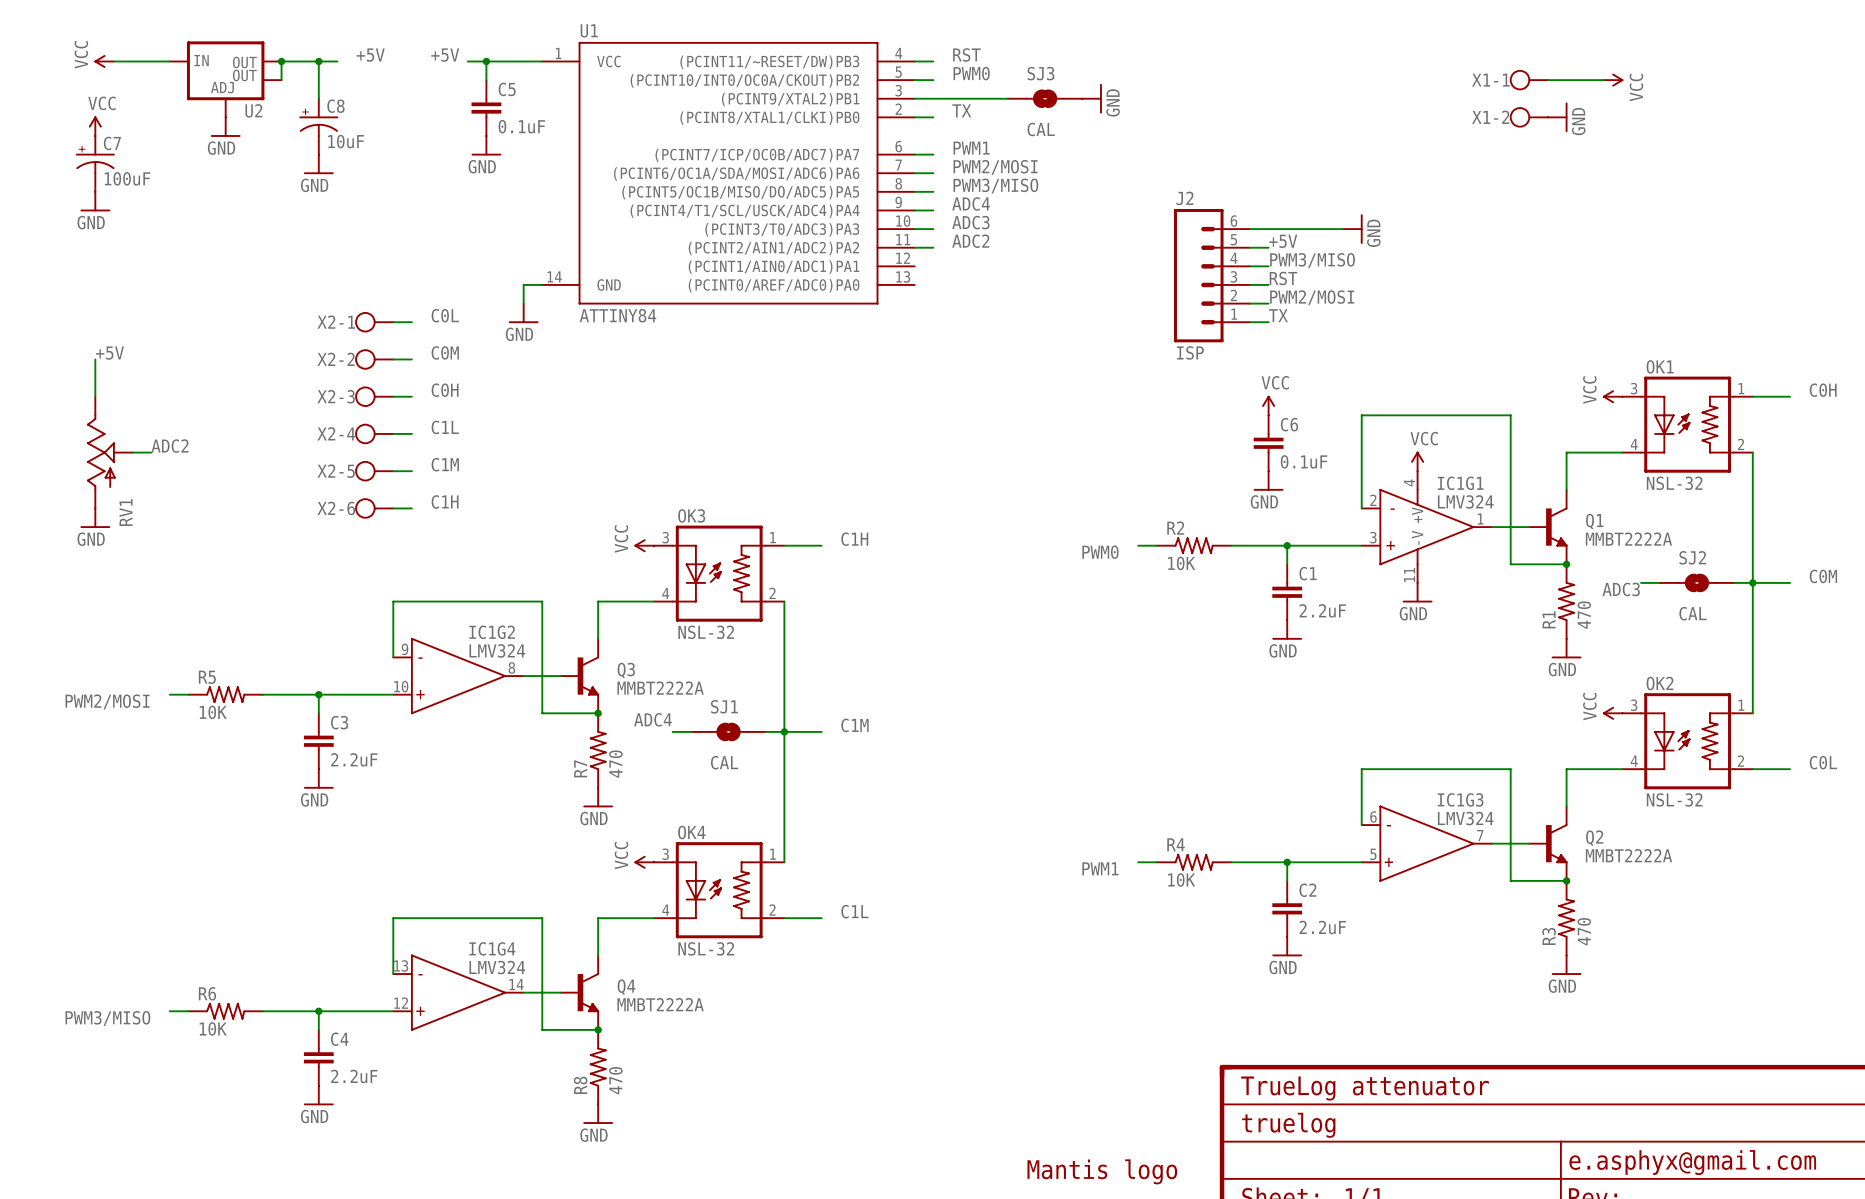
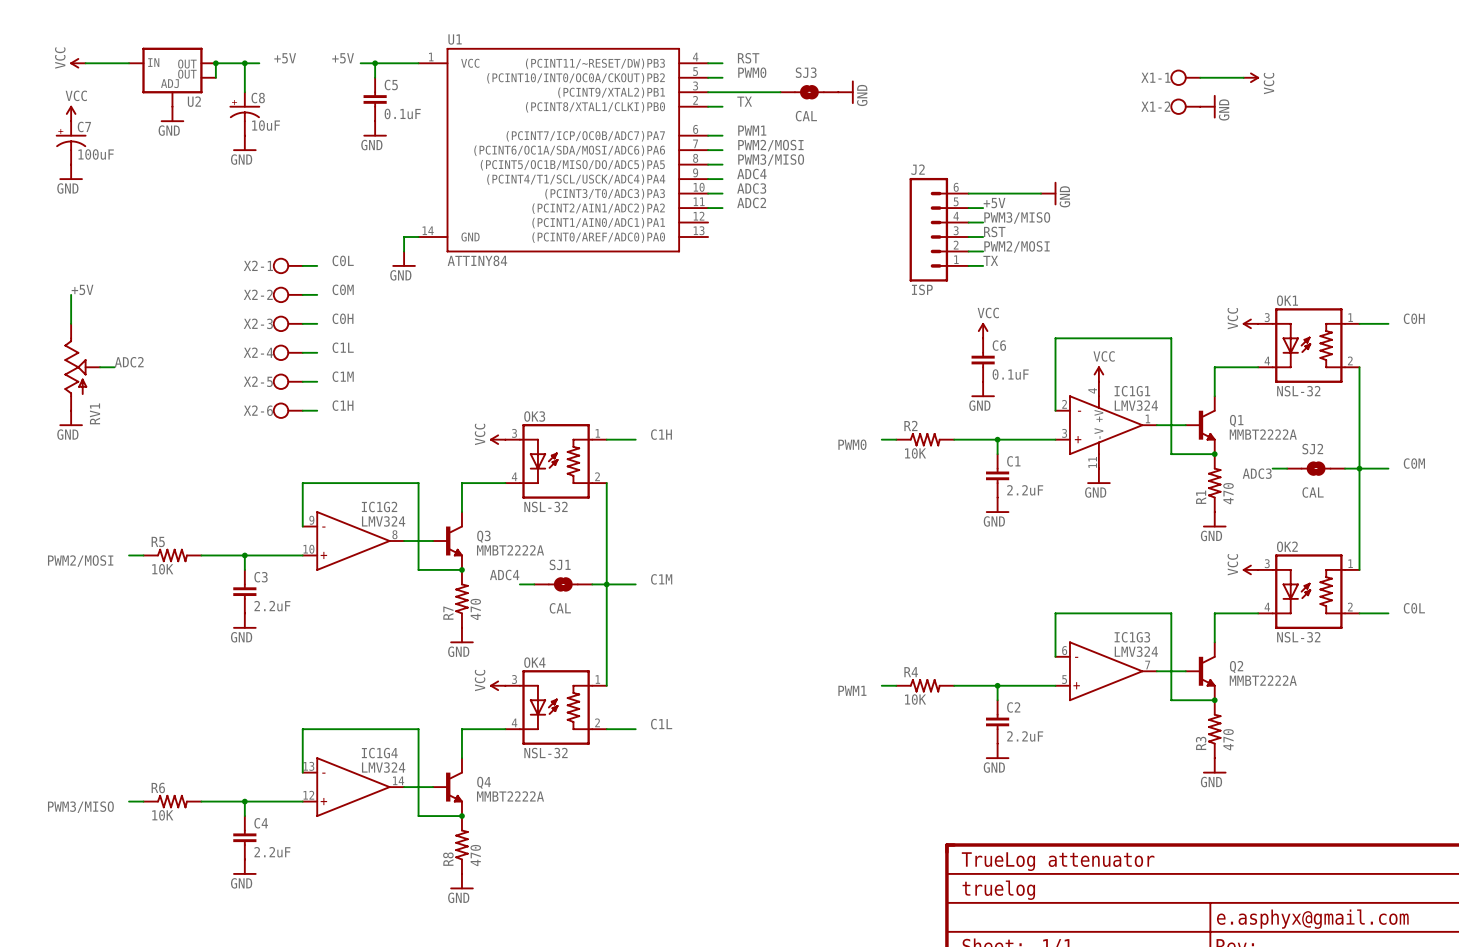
part: (1102, 1171) -> none

